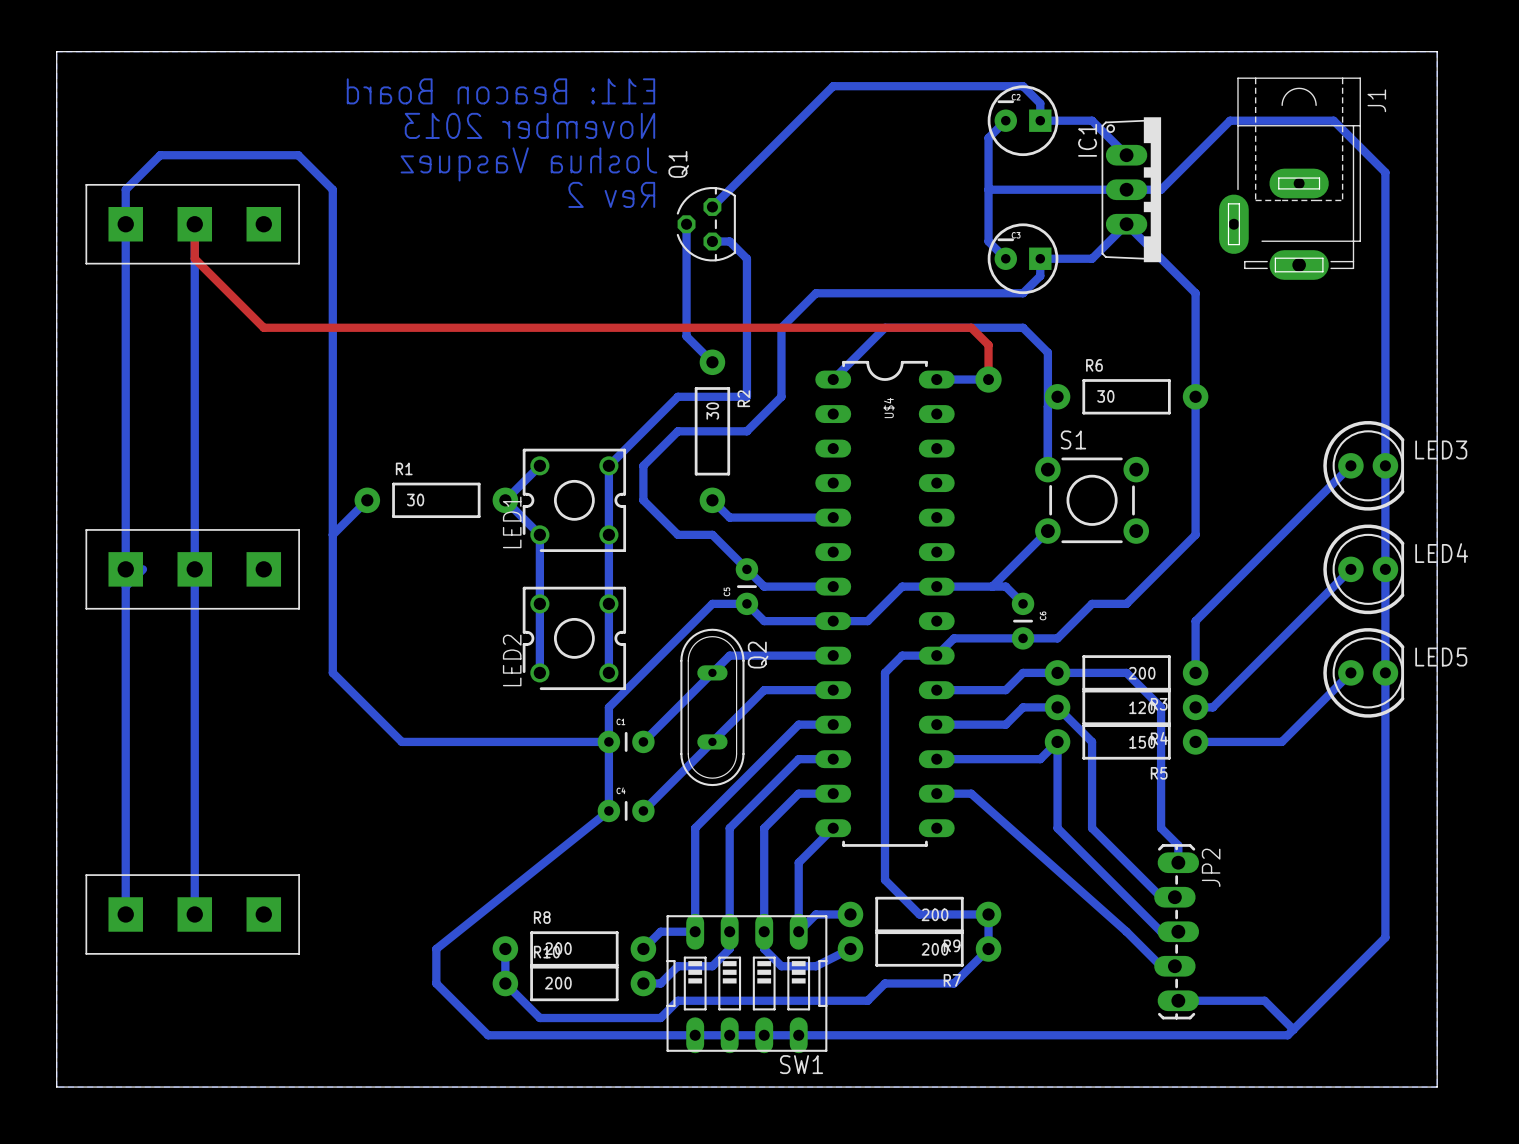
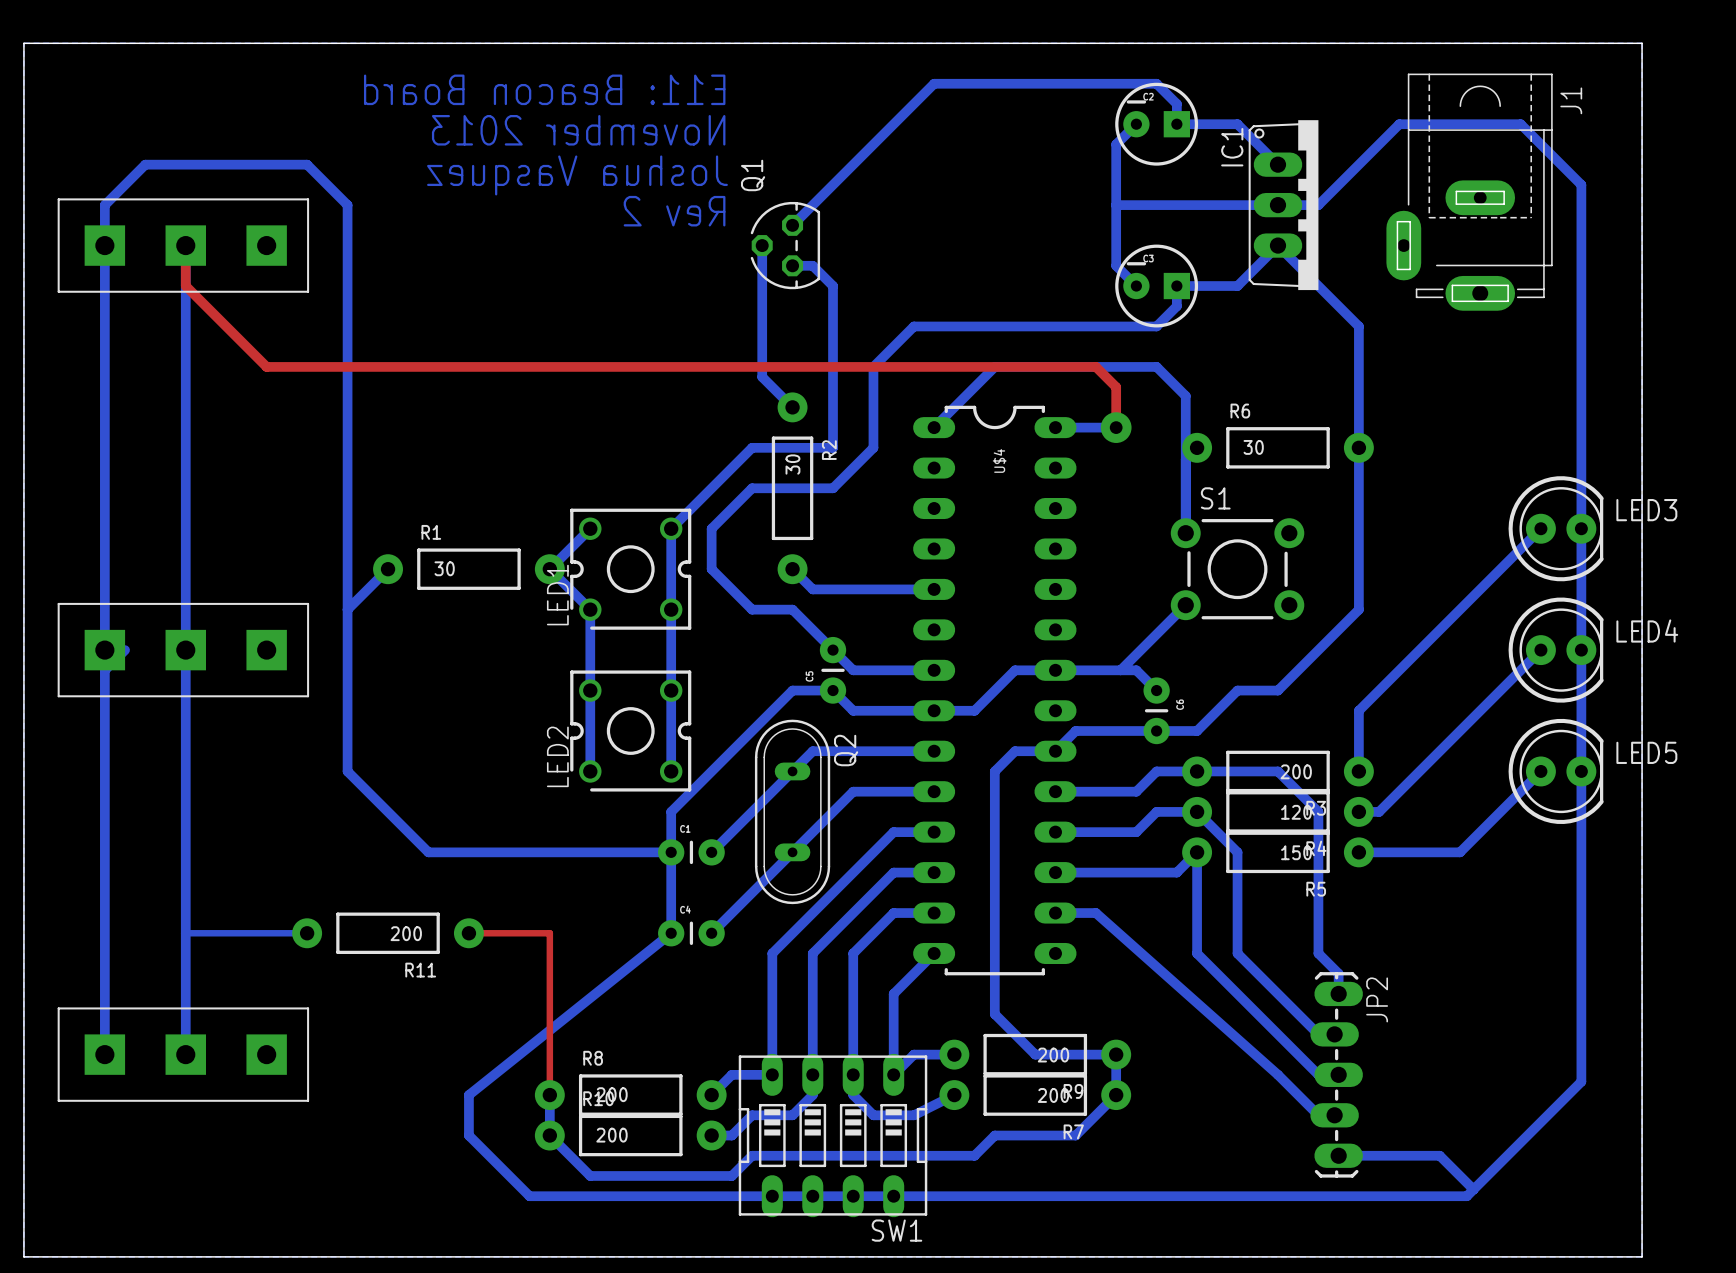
bottom track: none -> (185, 933) (307, 933)
R11: none -> 200 (388, 933)
top track: none -> (468, 933) (549, 933) (549, 1095)

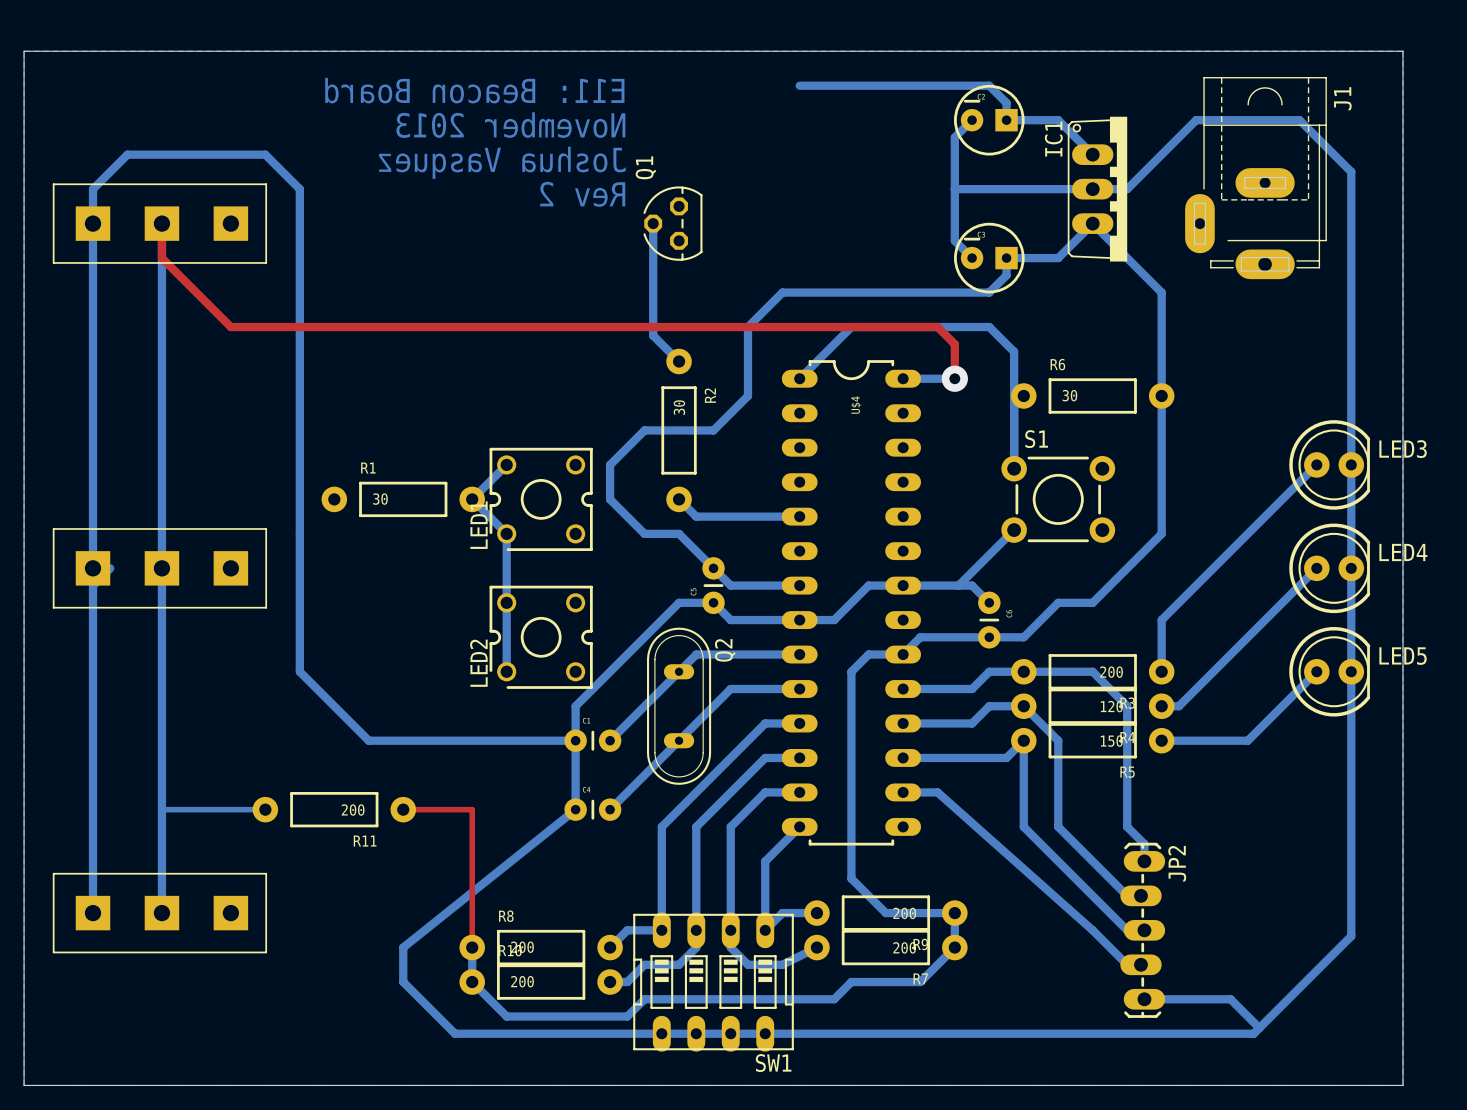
bottom track: (934, 83) (792, 225) -> none
bottom track: (792, 265) (812, 265) (833, 286) (833, 447) (752, 447) (671, 528) (671, 771) -> none
bottom track: (388, 569) (347, 609) -> none

